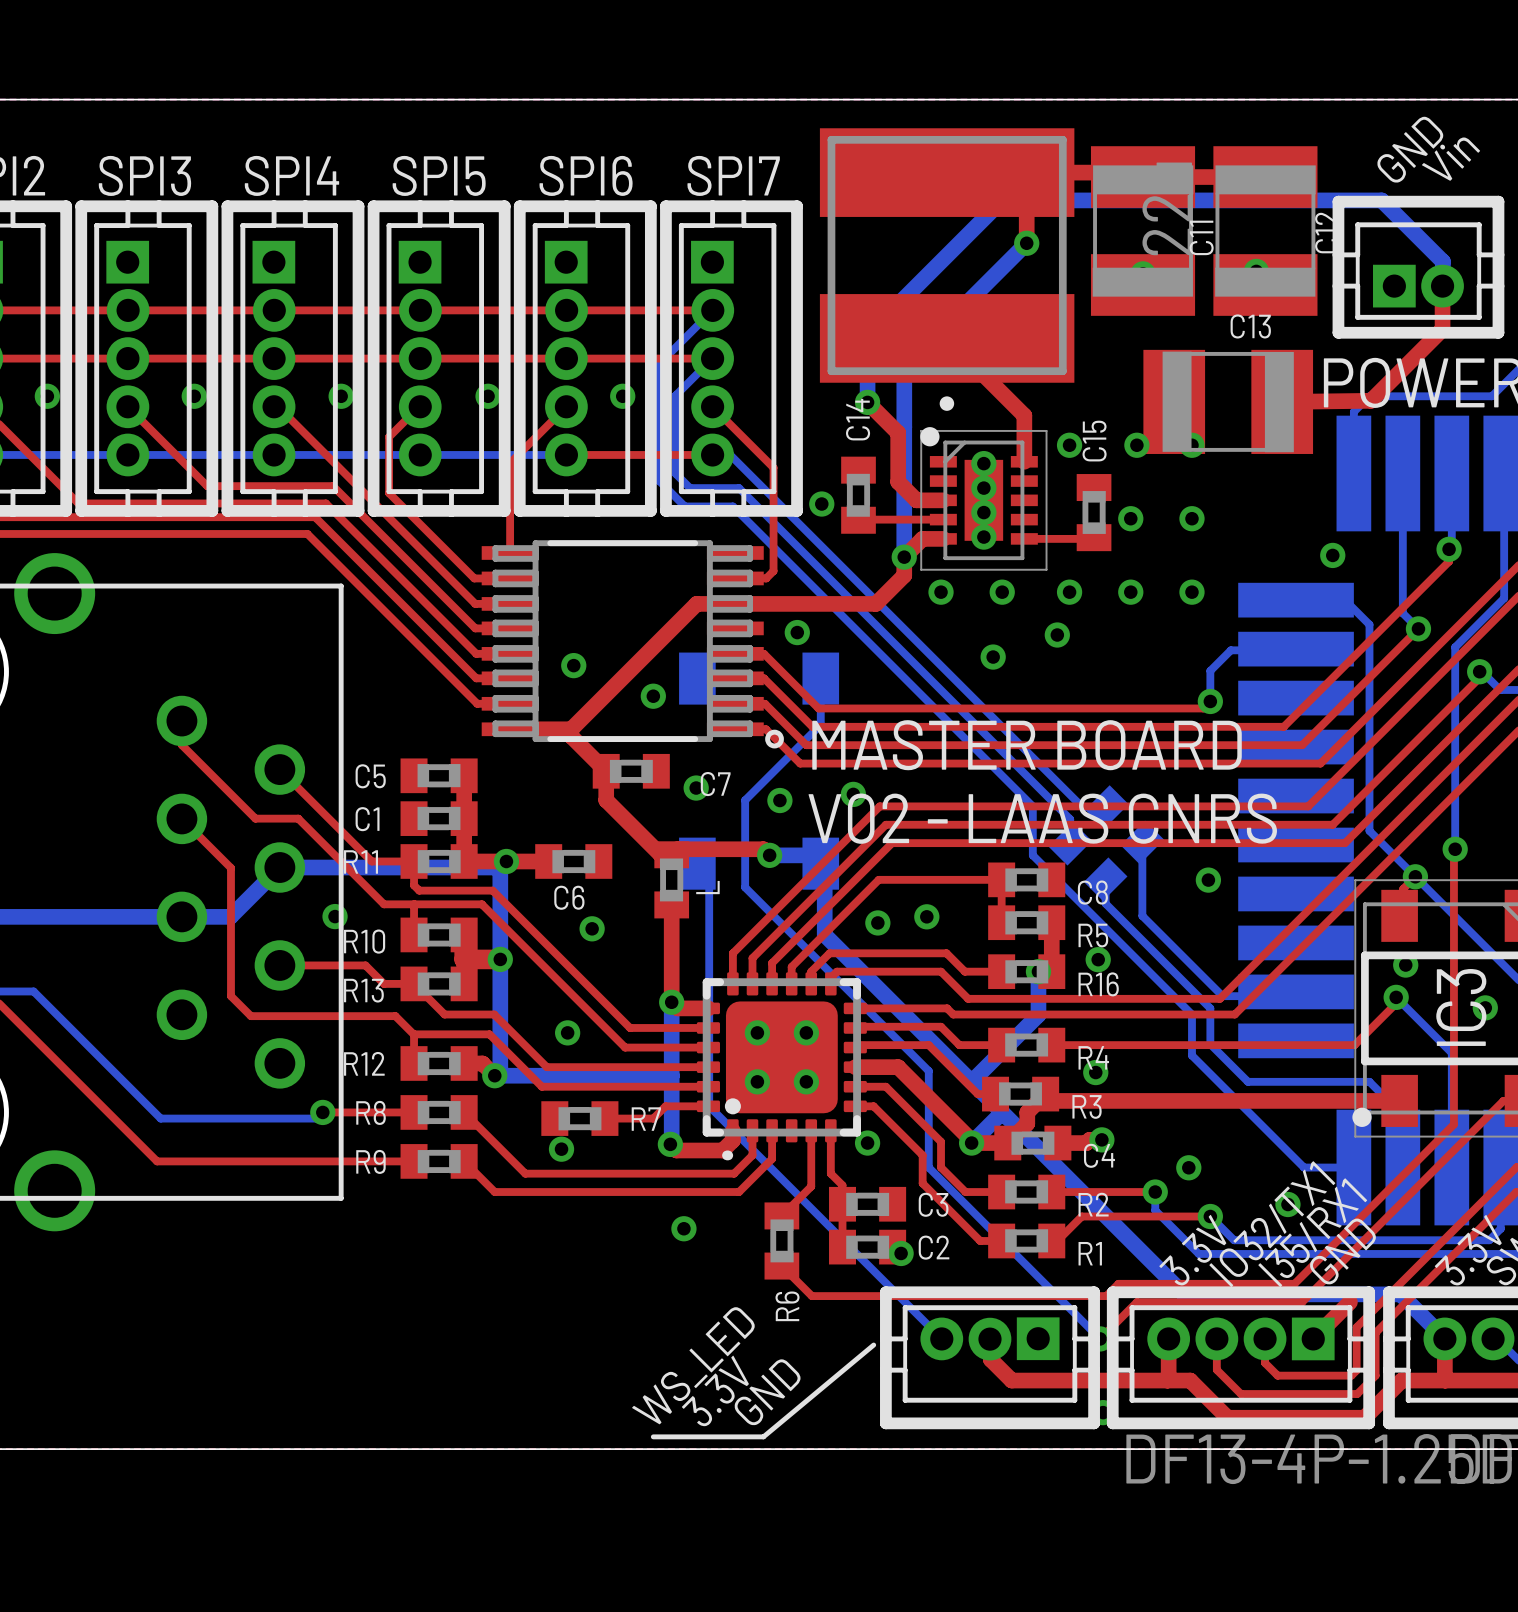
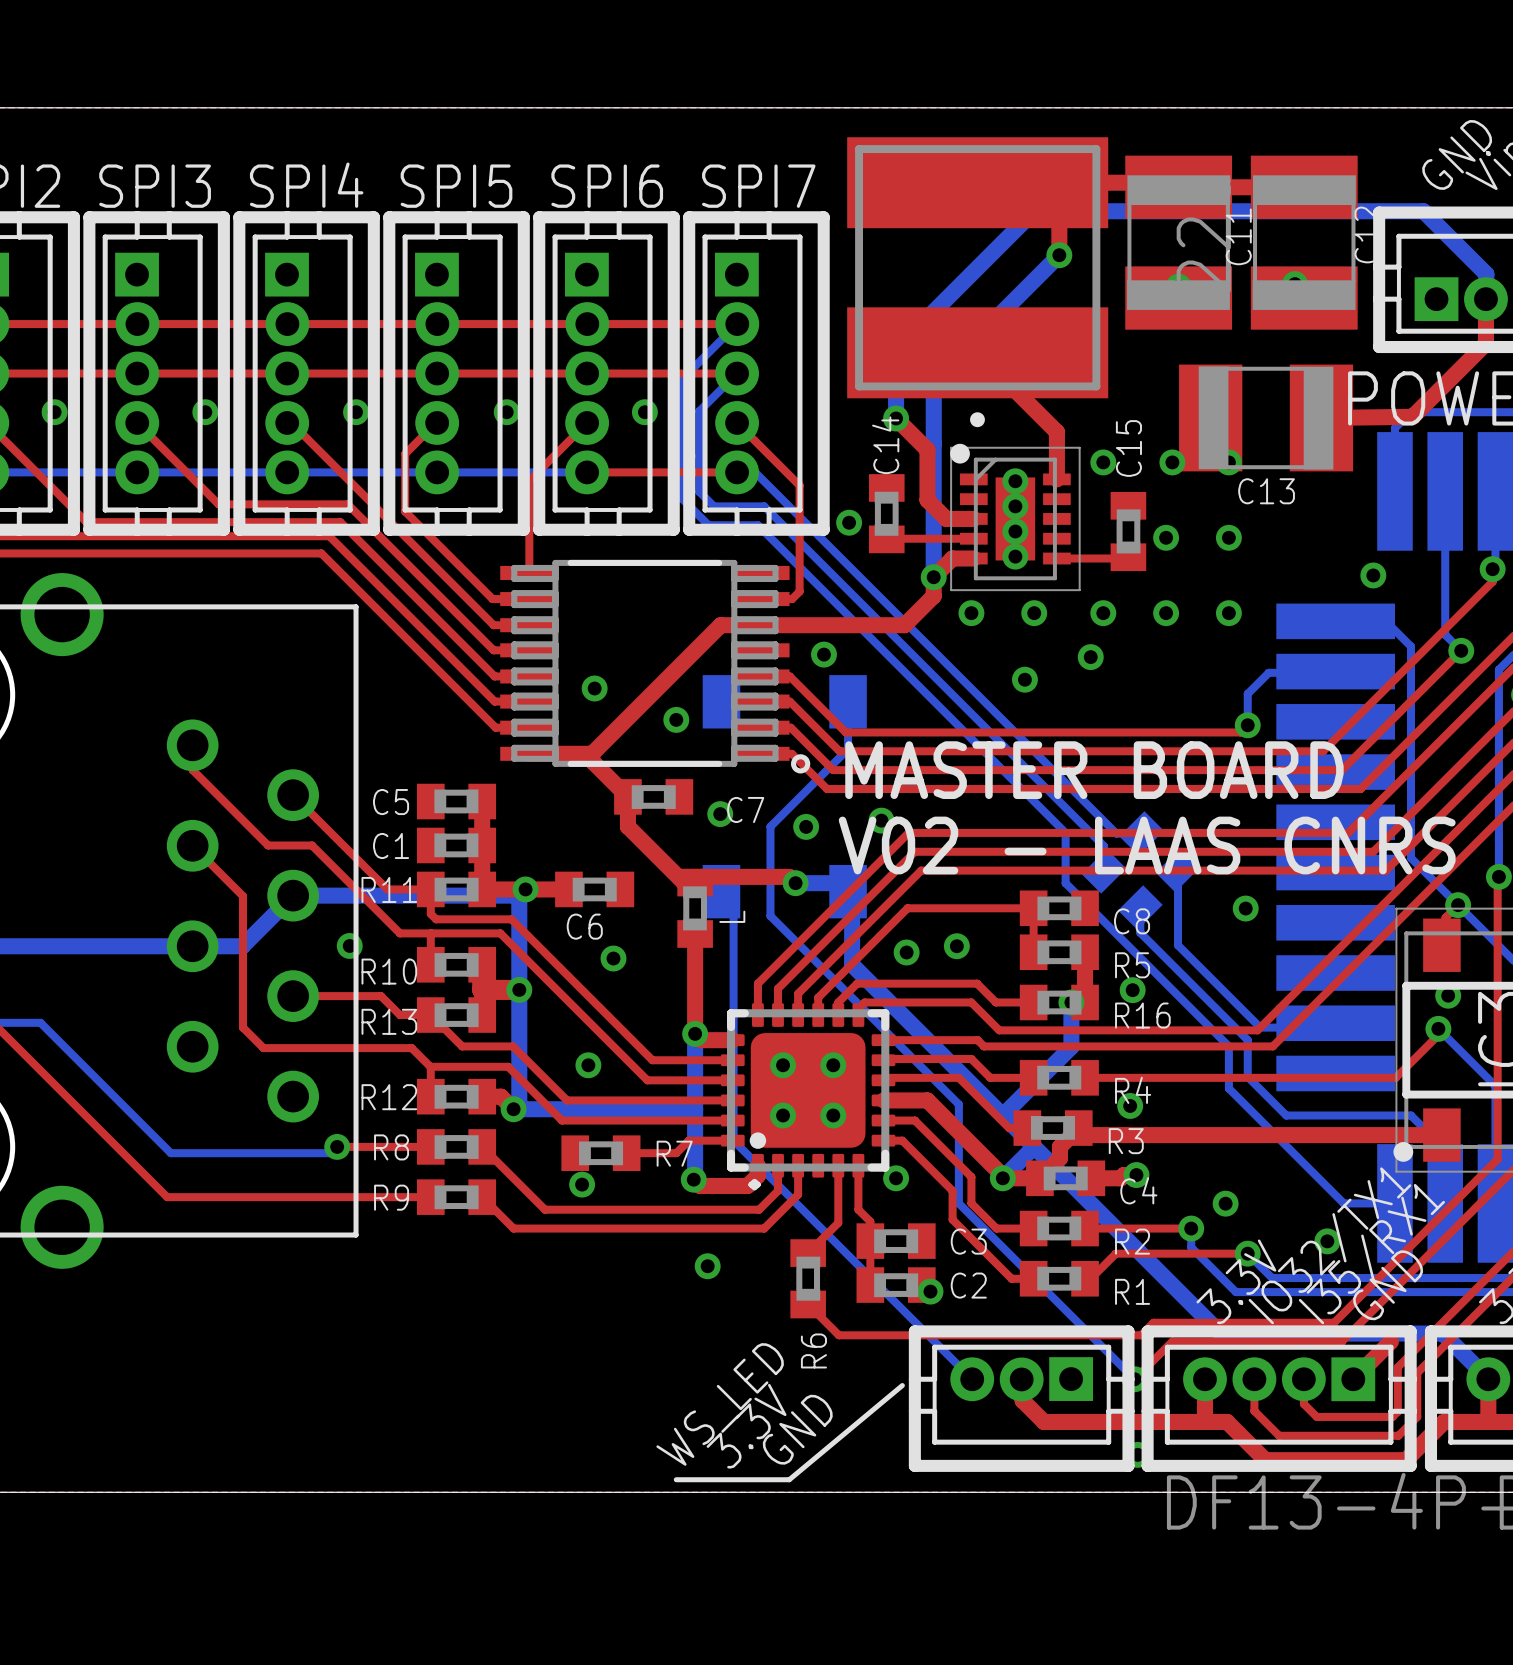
C13 name position: C13 (1250, 326) -> C13 (1266, 491)

